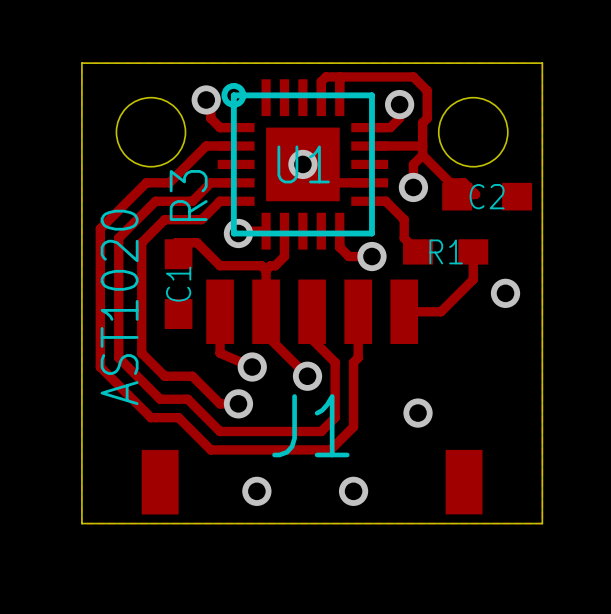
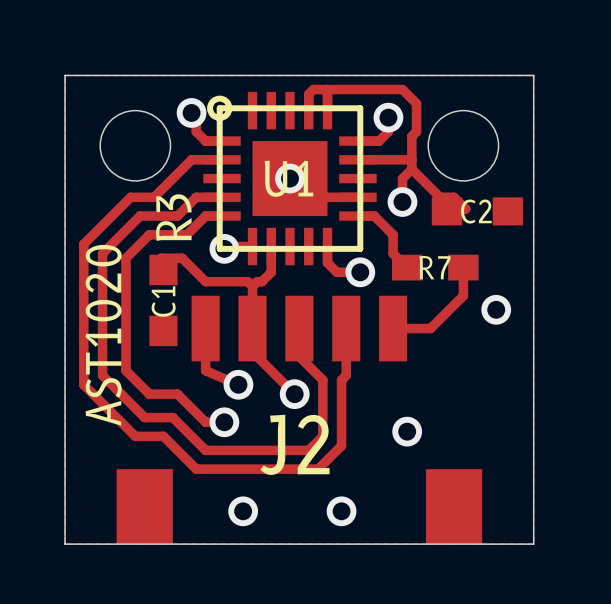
R1 name: R1 (446, 251) -> R7 (434, 267)
J1: (312, 396) -> none
J2: none -> (299, 419)

